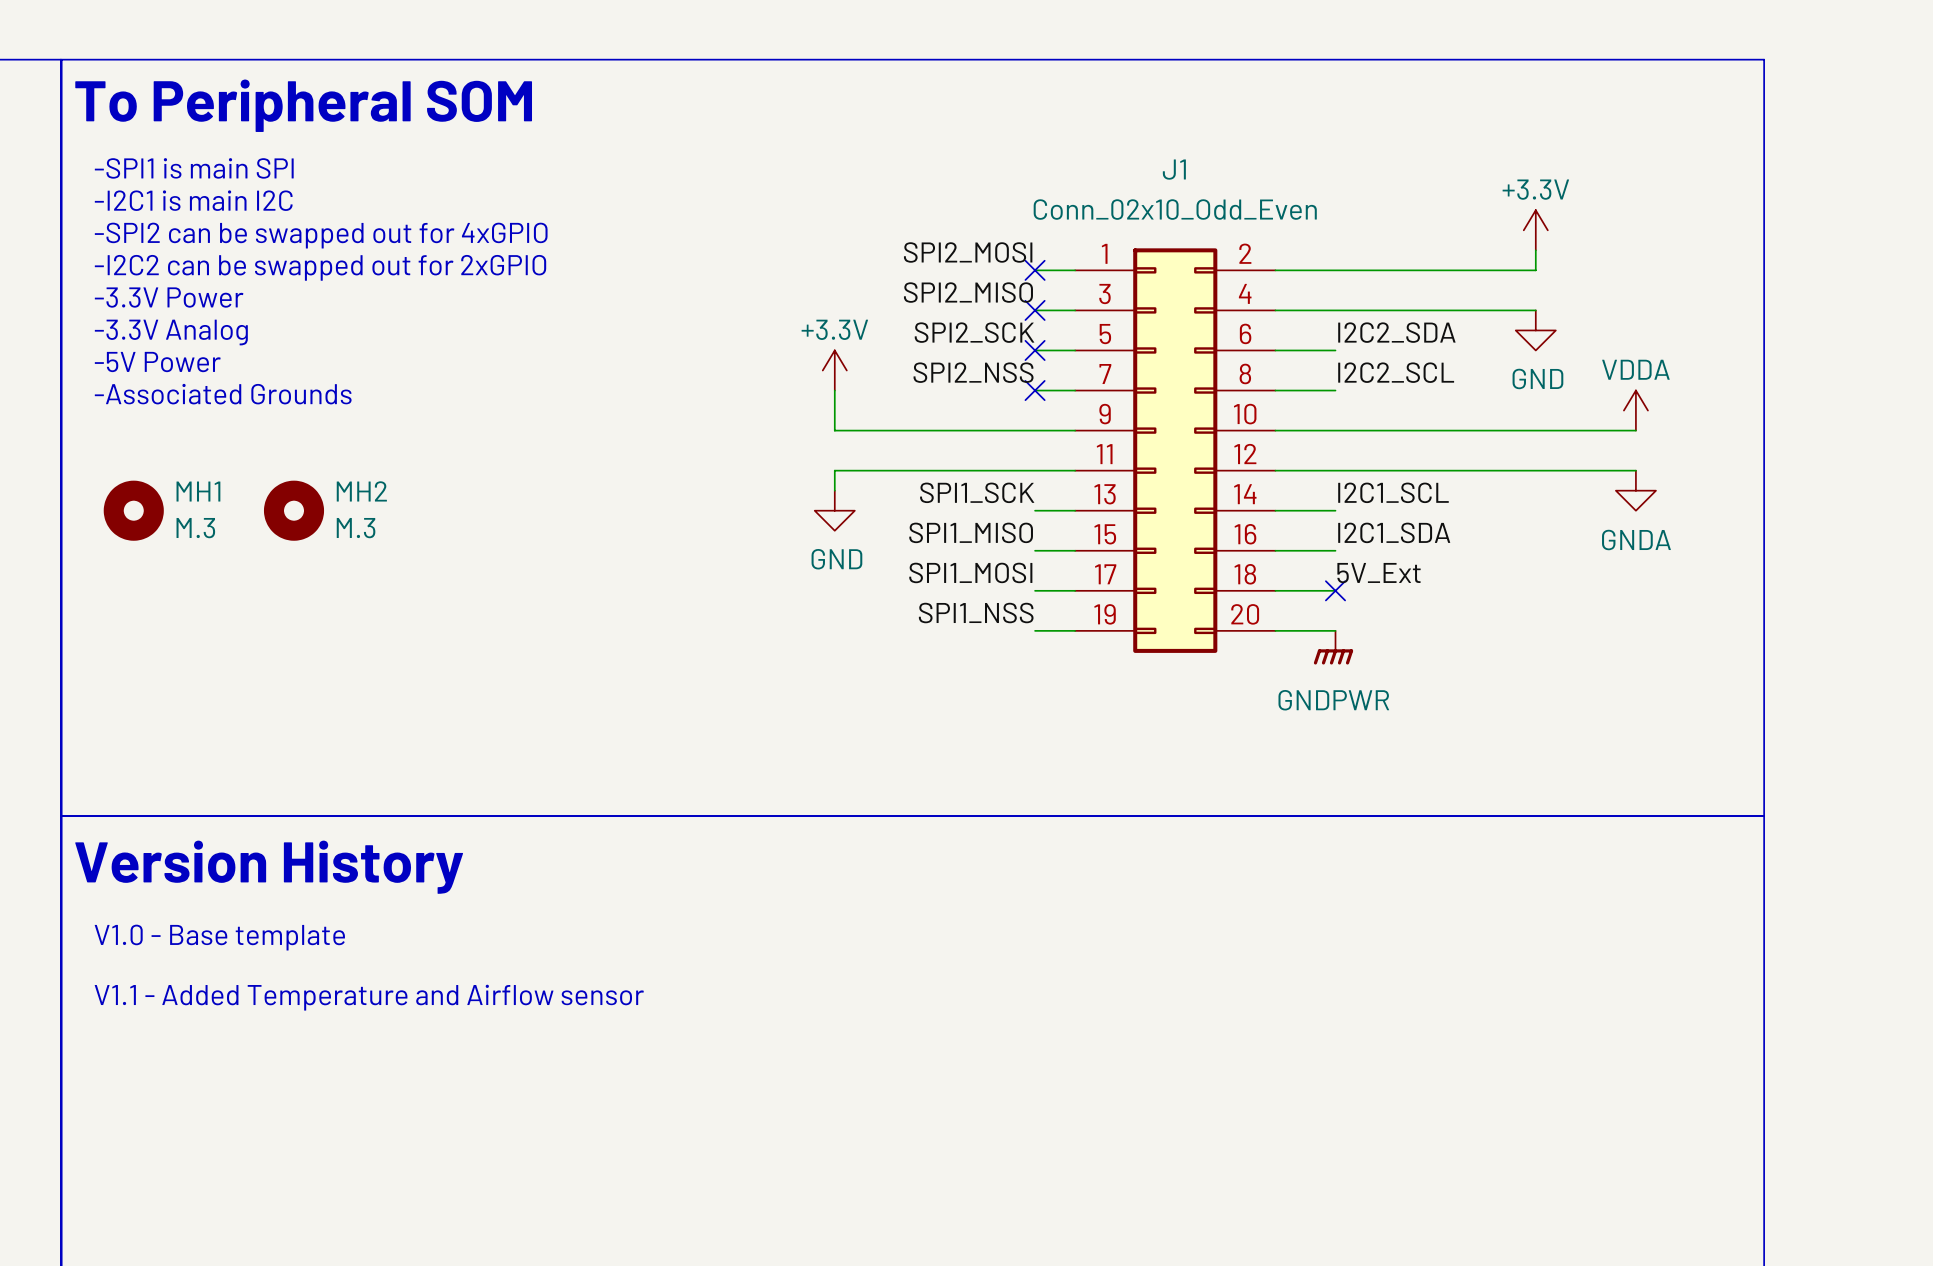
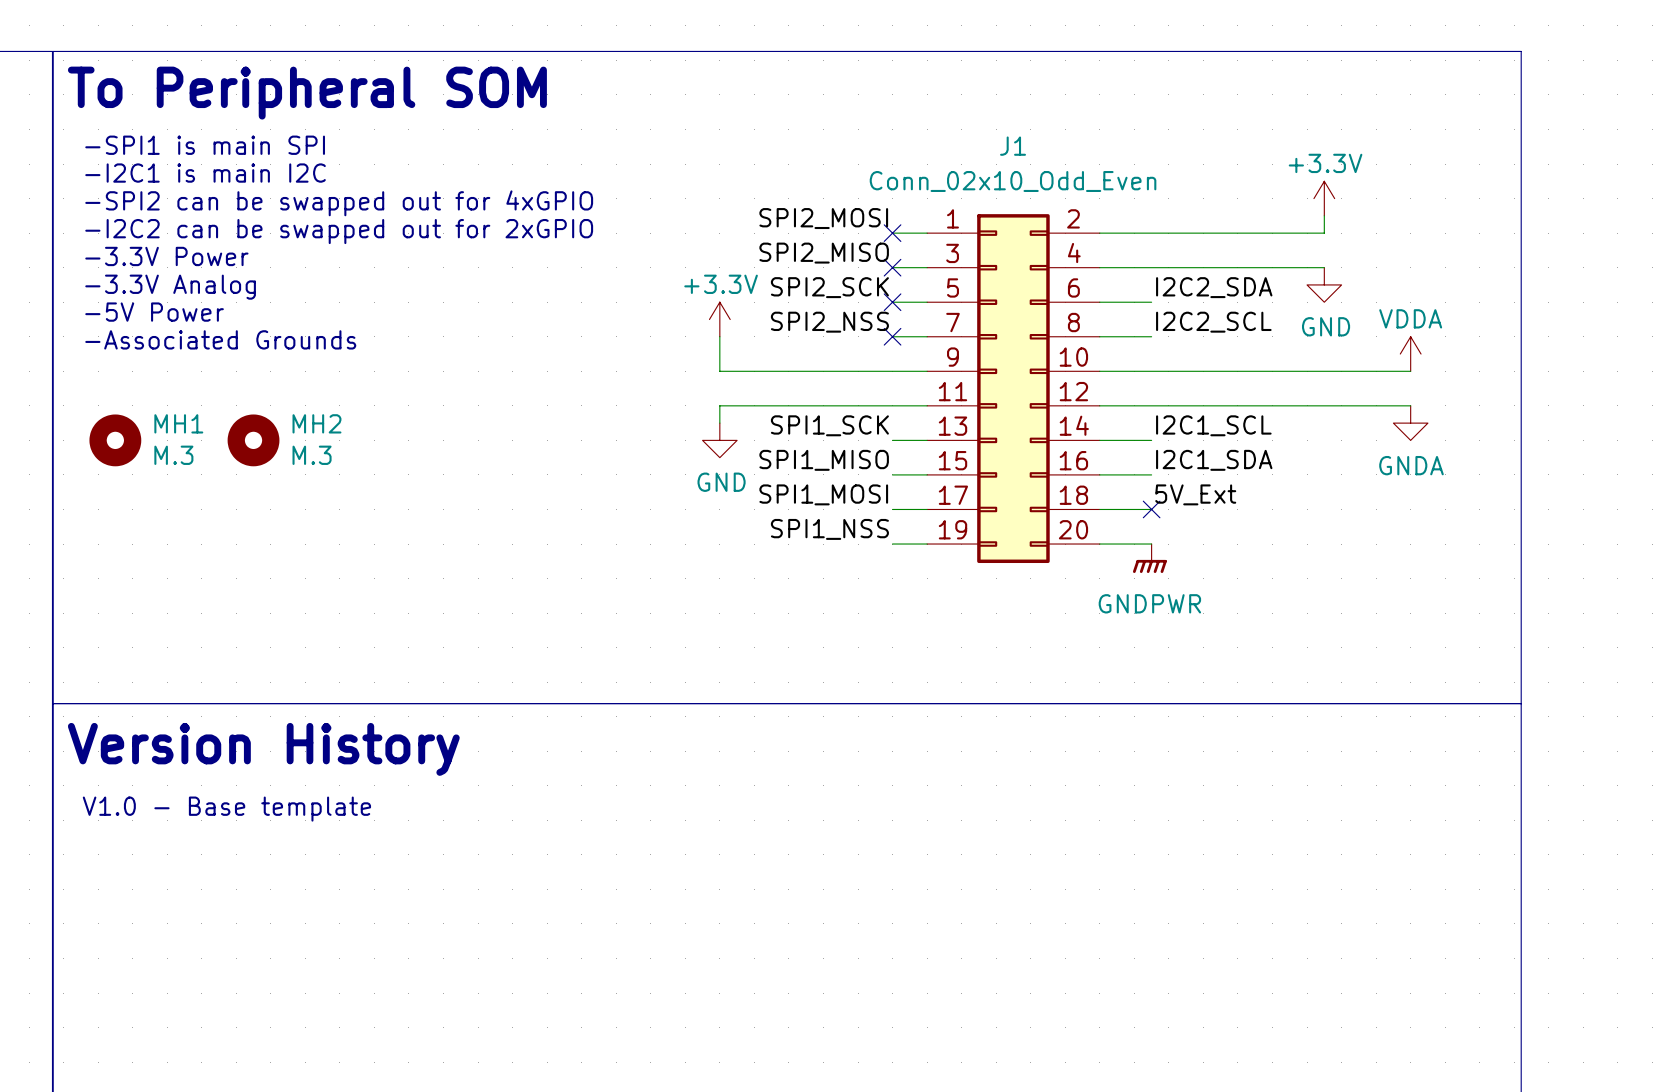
text: V1.1 - Added Temperature and Airflow sensor (369, 997) -> none

